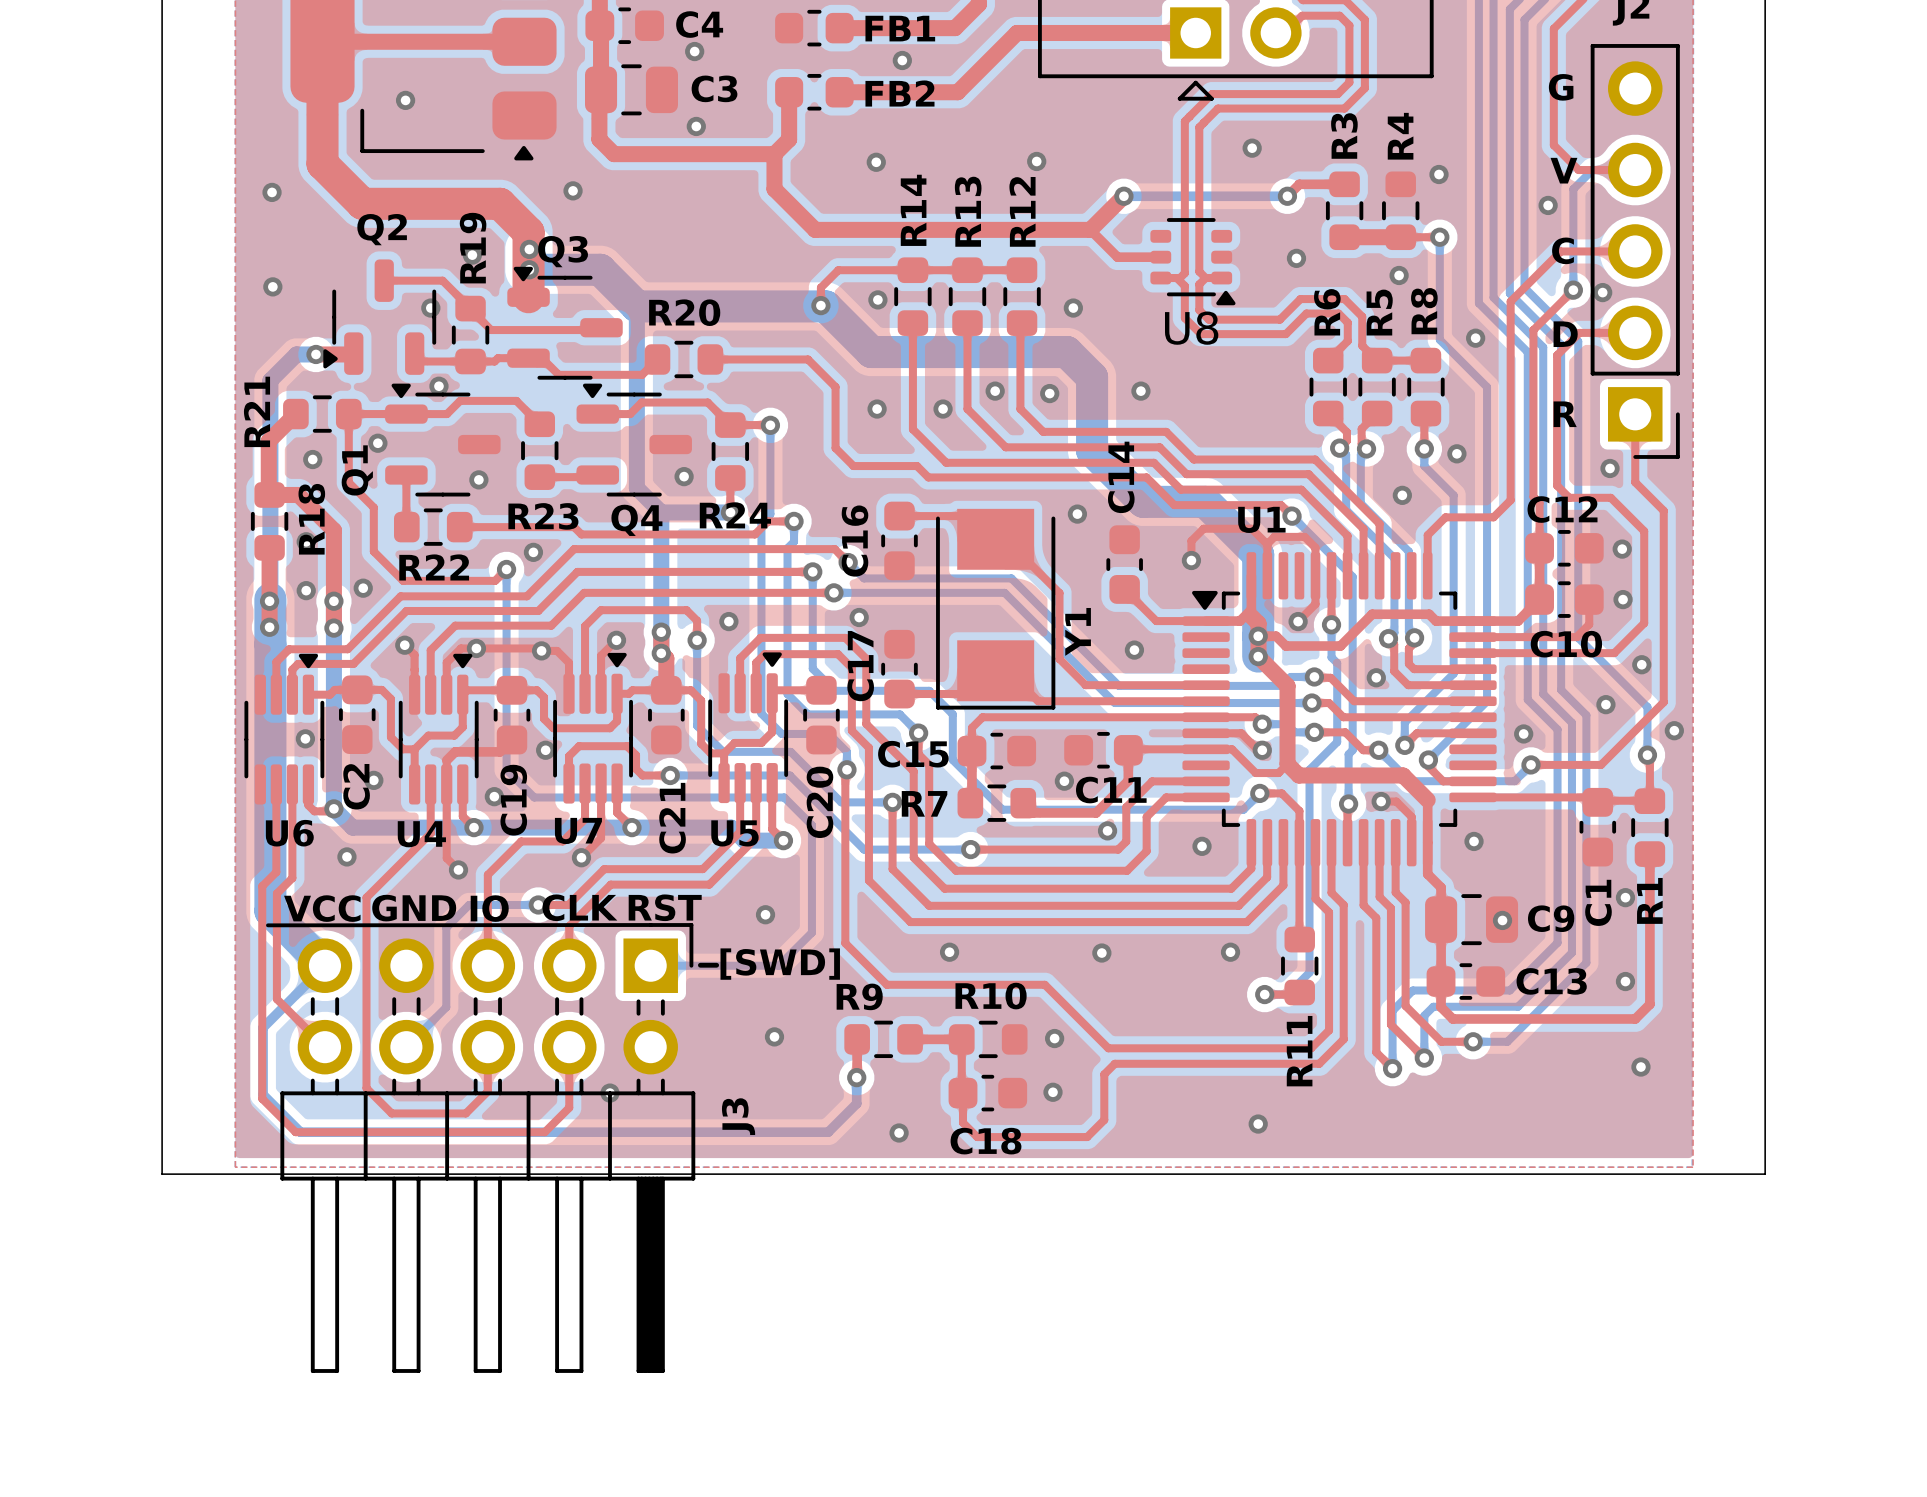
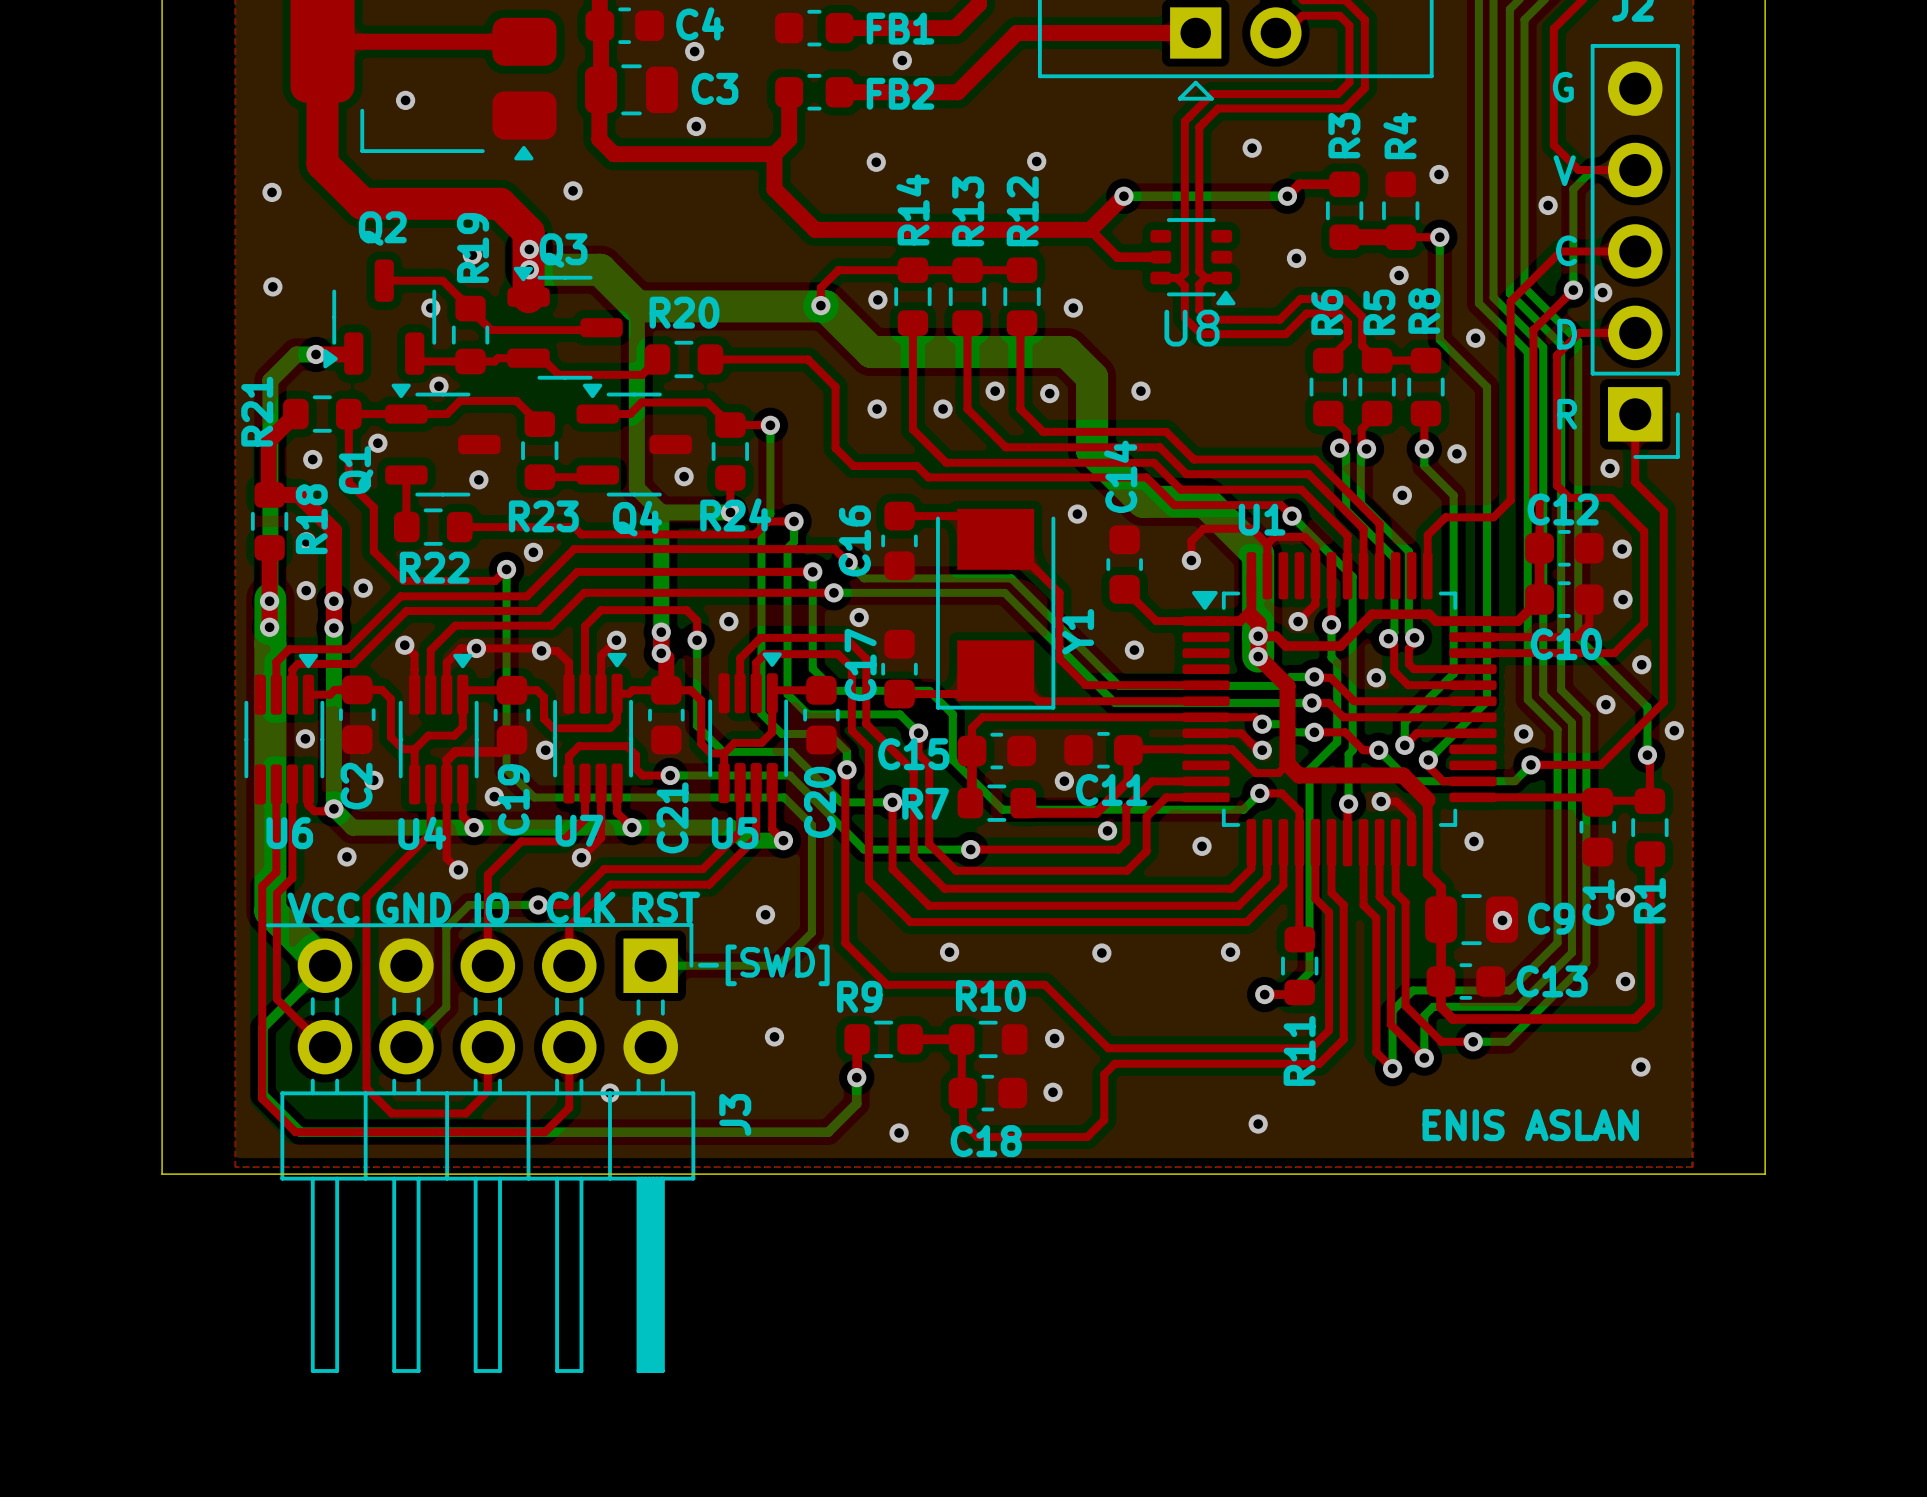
text: none -> ENIS ASLAN (1530, 1125)

